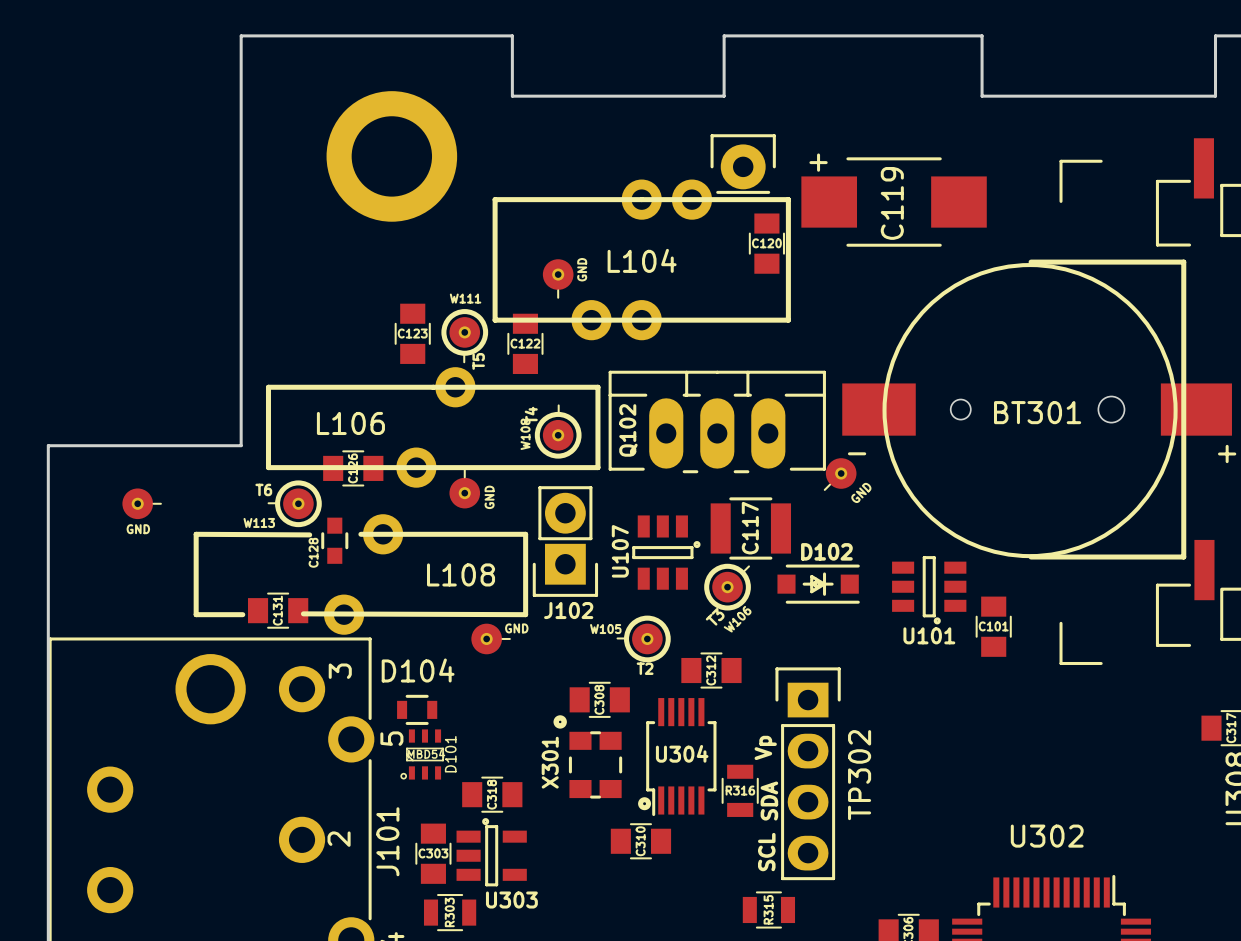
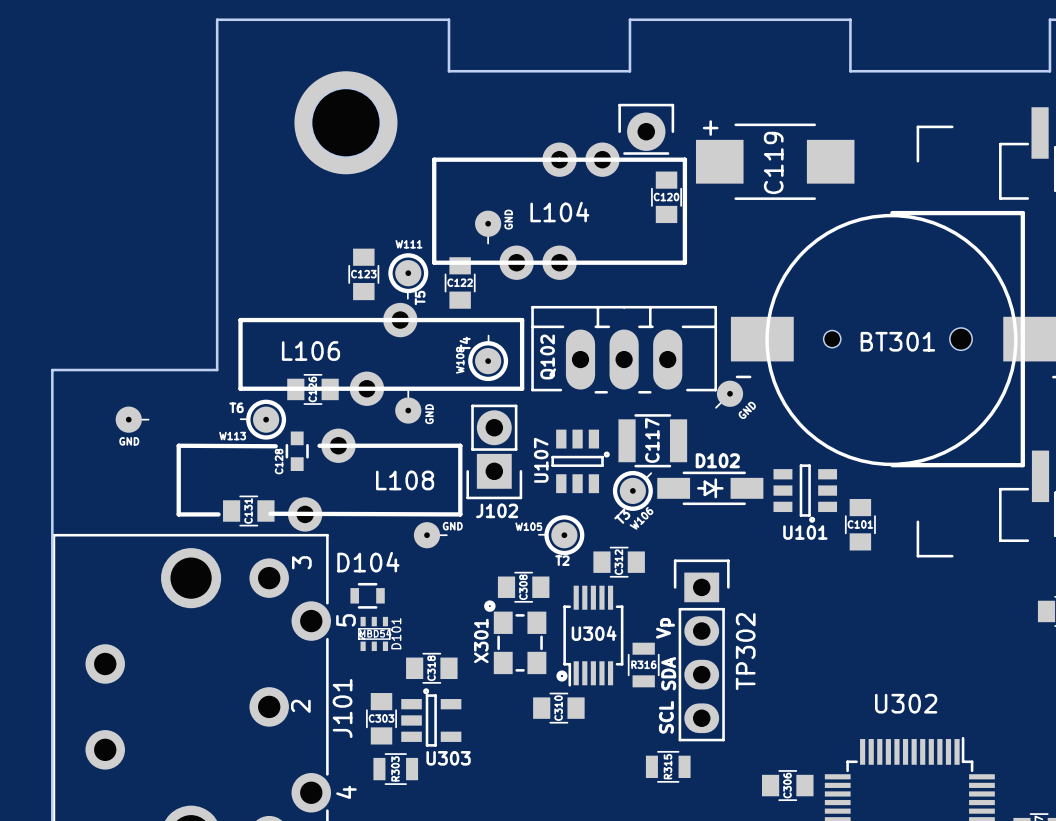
part footprint: [326, 91, 458, 222] -> [294, 71, 398, 175]
D102 footprint: [777, 564, 860, 604] -> [657, 471, 764, 506]
X301 footprint: [553, 715, 623, 799] -> [484, 600, 547, 675]
D101 footprint: [400, 729, 444, 780] -> [358, 616, 391, 652]

